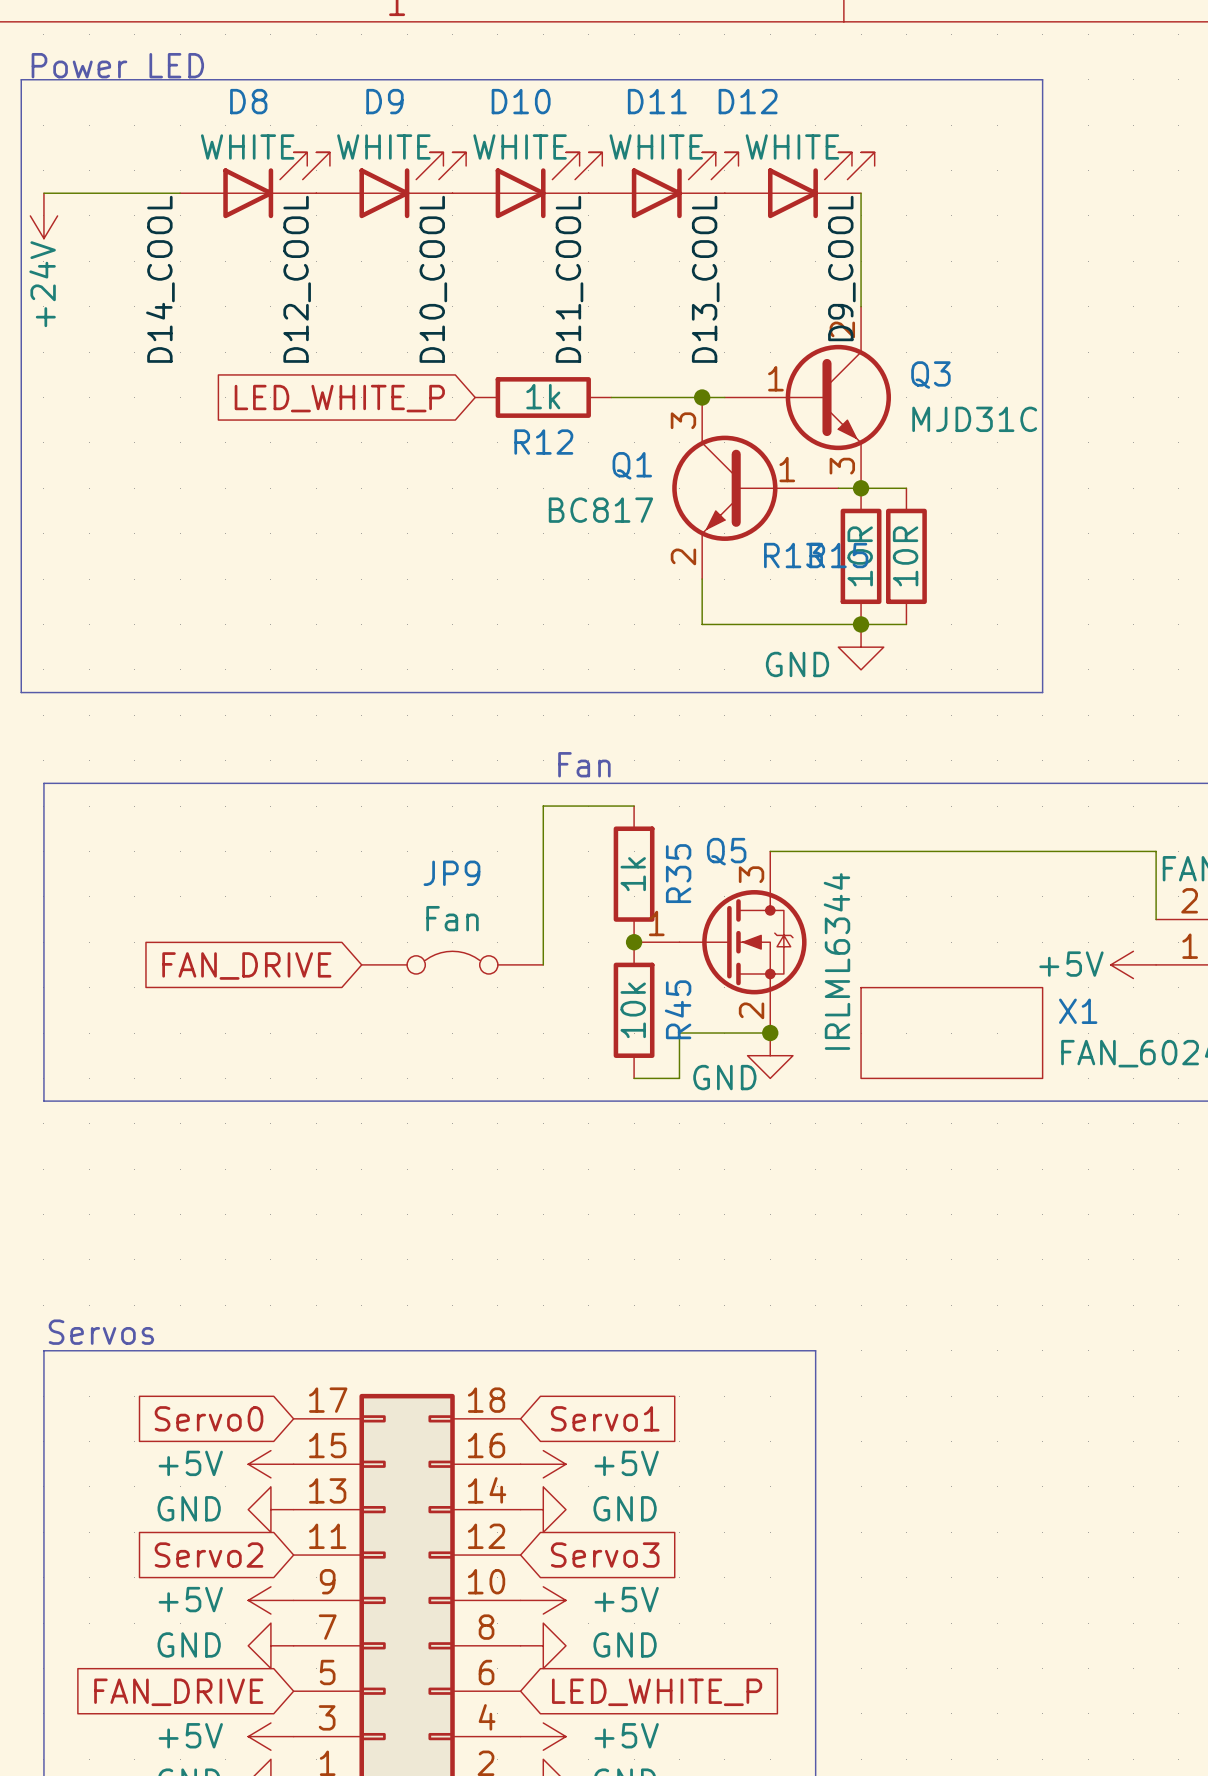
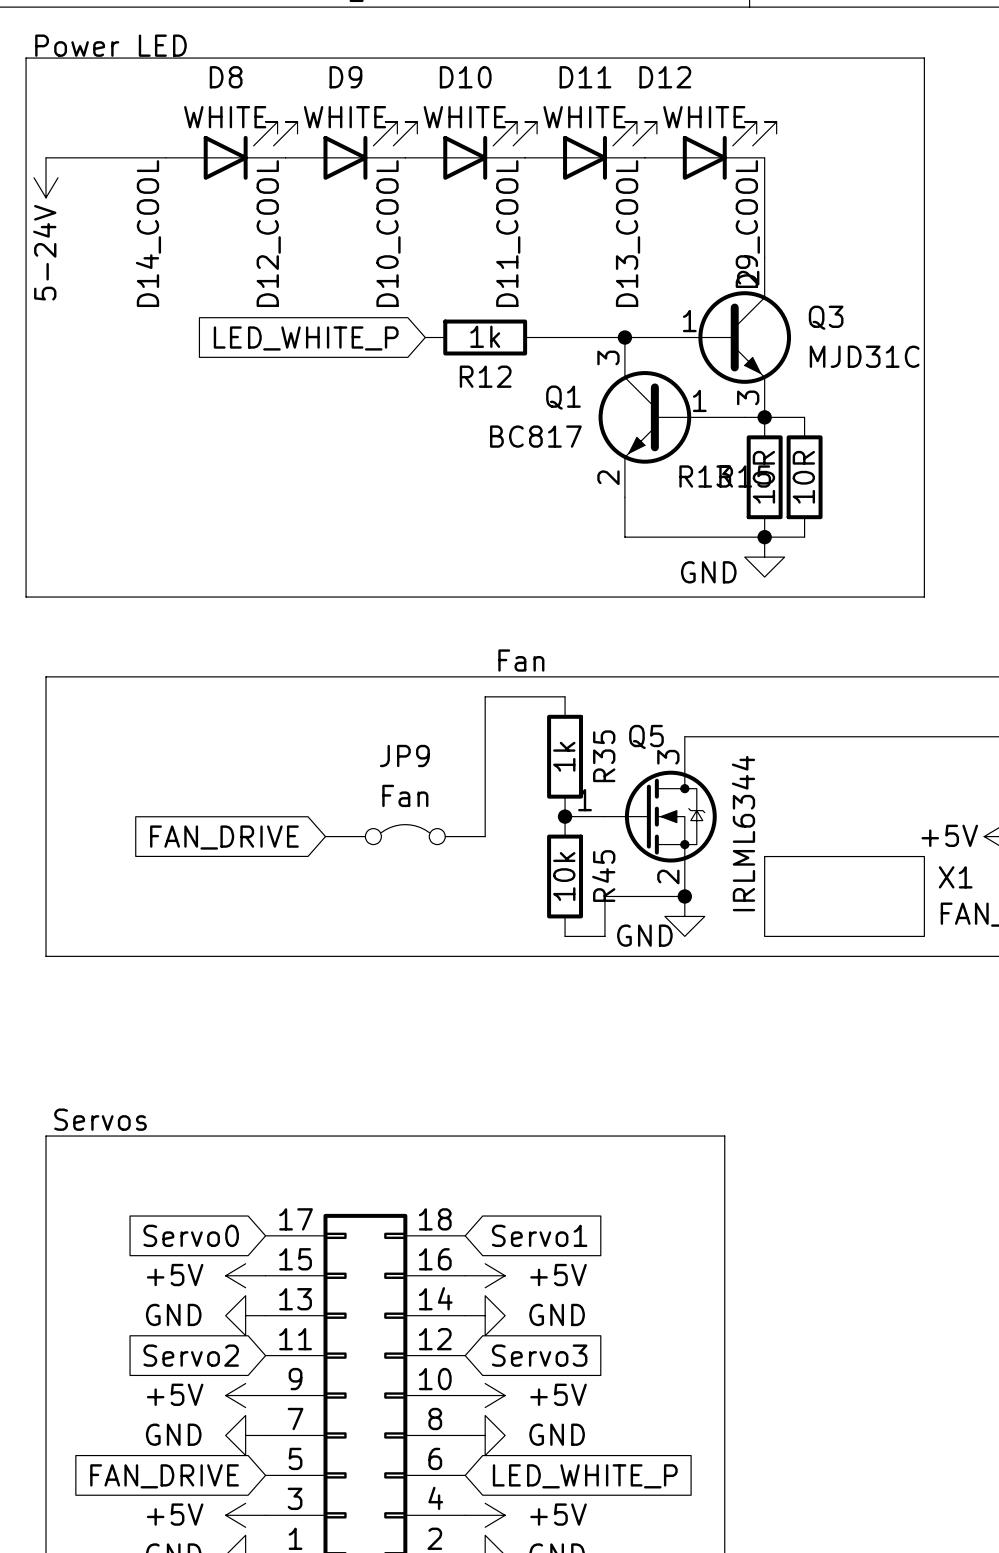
power symbol: +24V (43, 215) -> 5-24V (46, 177)
text position: Servos (101, 1332) -> Servos (100, 1119)
line: (43, 1350) (815, 1350) -> (46, 1175) (46, 1136) (724, 1136) (724, 1175)

